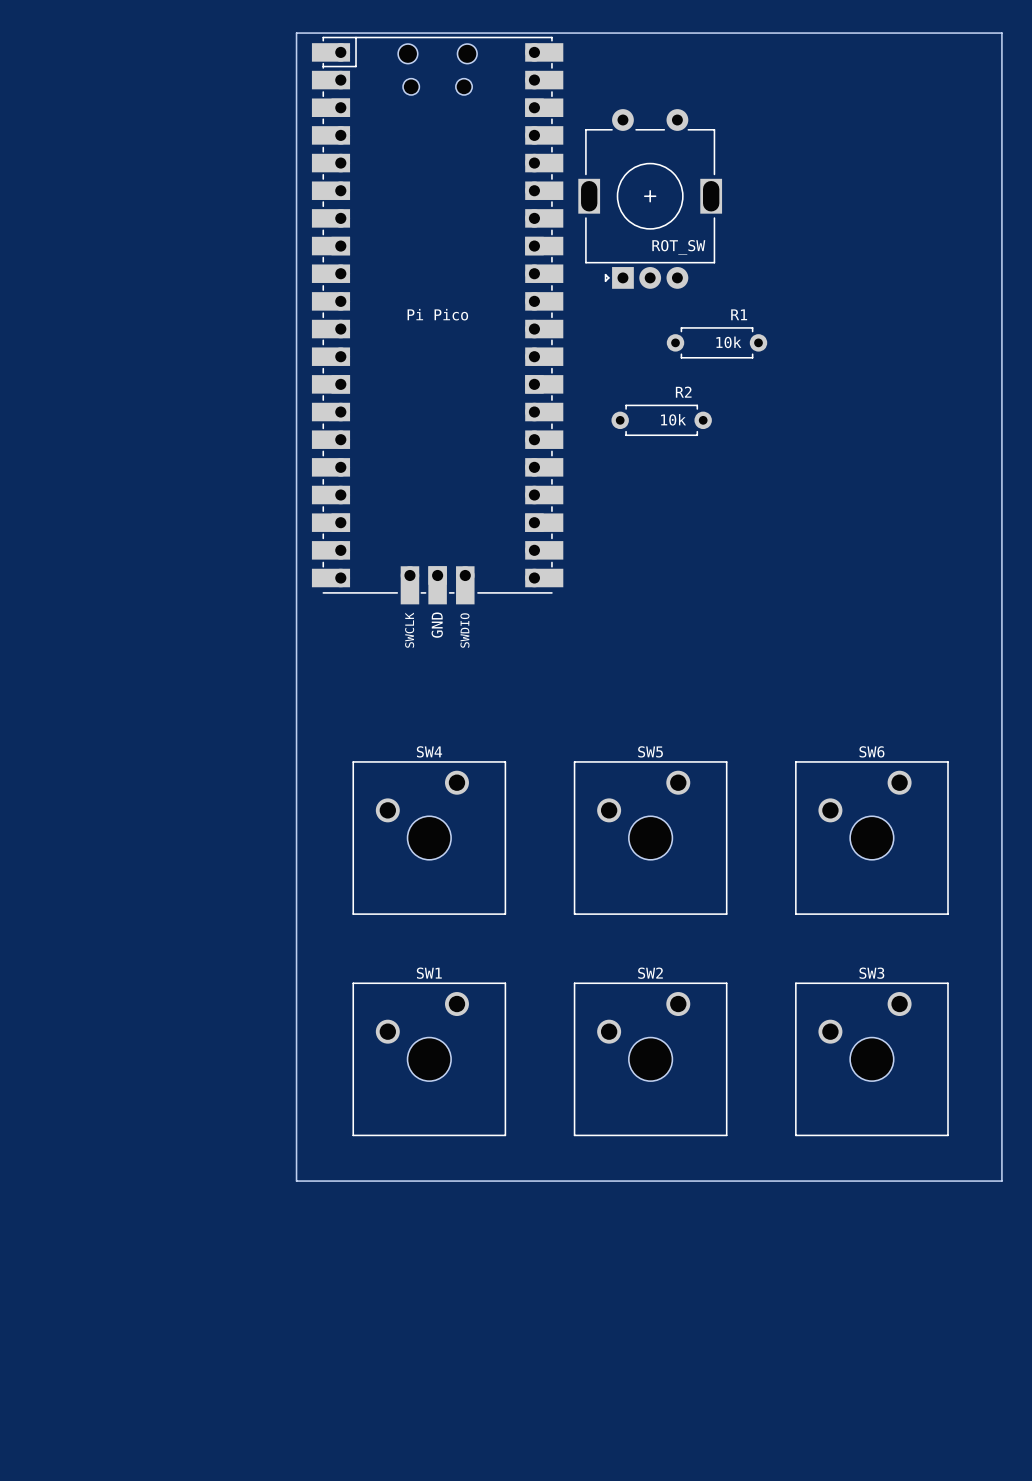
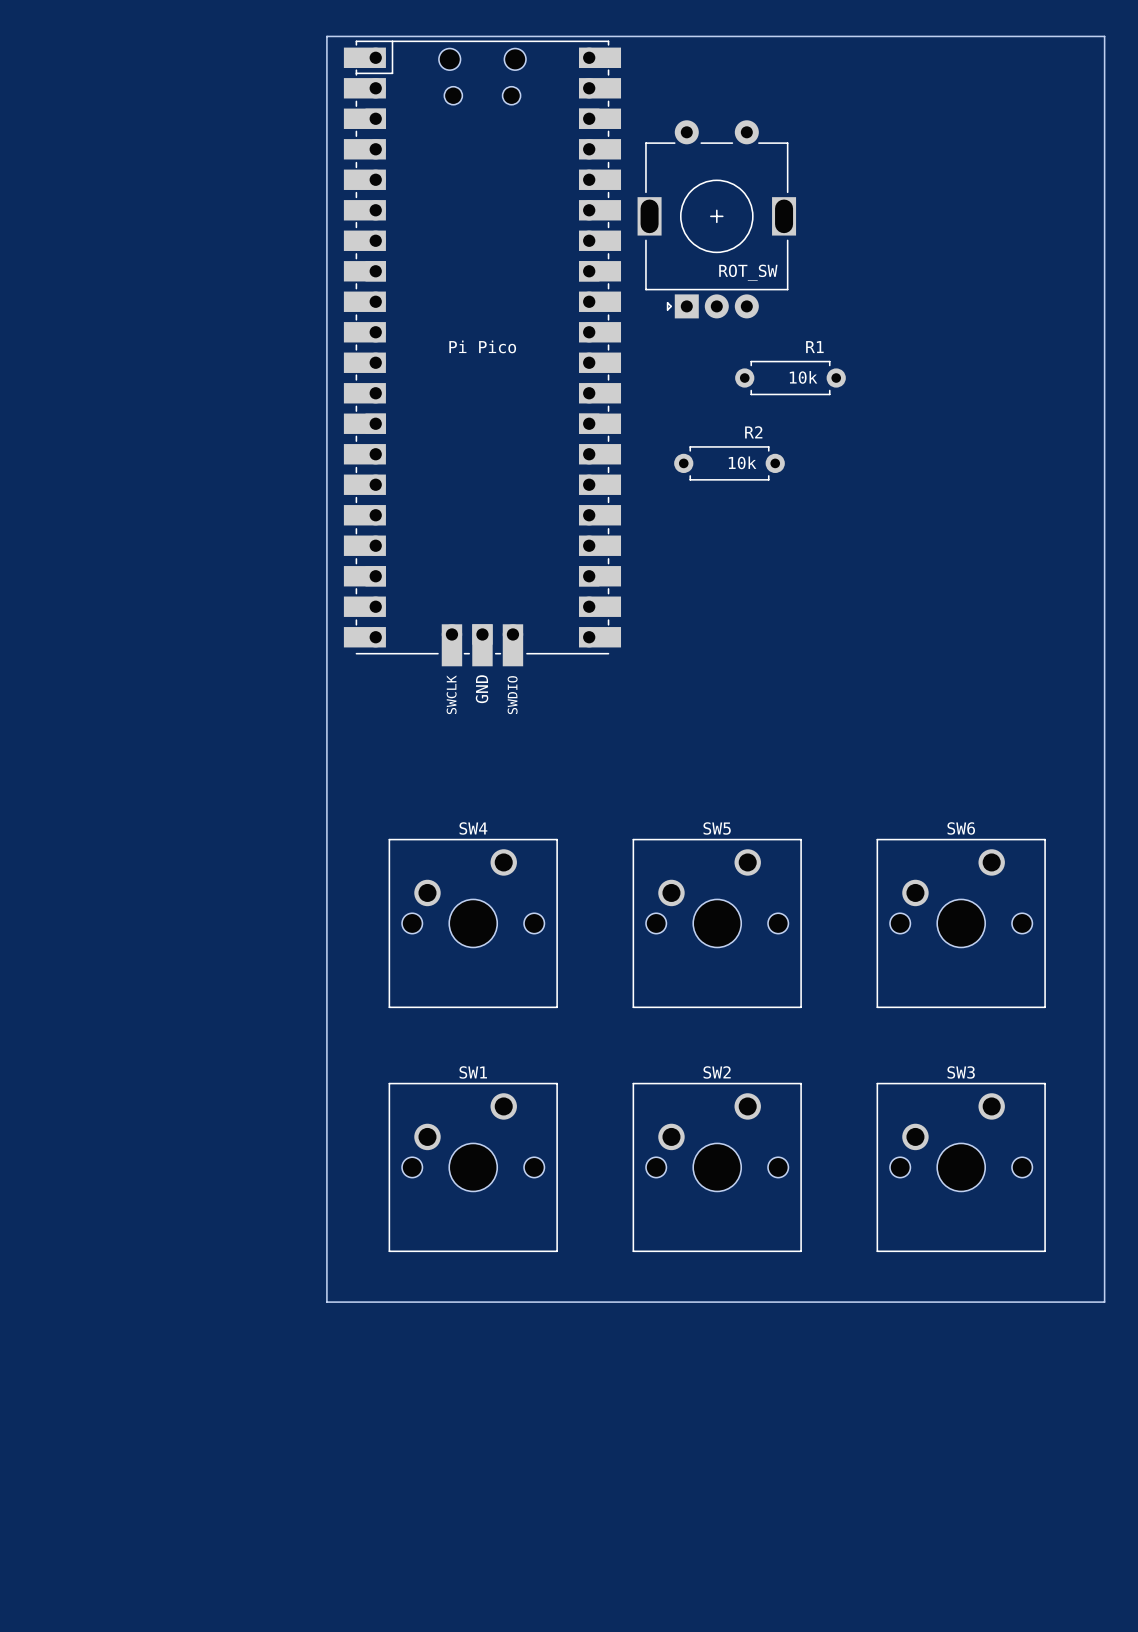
SW4 footprint: [352, 761, 507, 915] -> [388, 838, 558, 1009]
SW5 footprint: [573, 761, 728, 915] -> [632, 838, 802, 1009]
SW6 footprint: [795, 761, 949, 915] -> [876, 838, 1046, 1009]
SW1 footprint: [352, 982, 507, 1137] -> [388, 1082, 558, 1253]
SW2 footprint: [573, 982, 728, 1137] -> [632, 1082, 802, 1253]
SW3 footprint: [795, 982, 949, 1137] -> [876, 1082, 1046, 1253]

